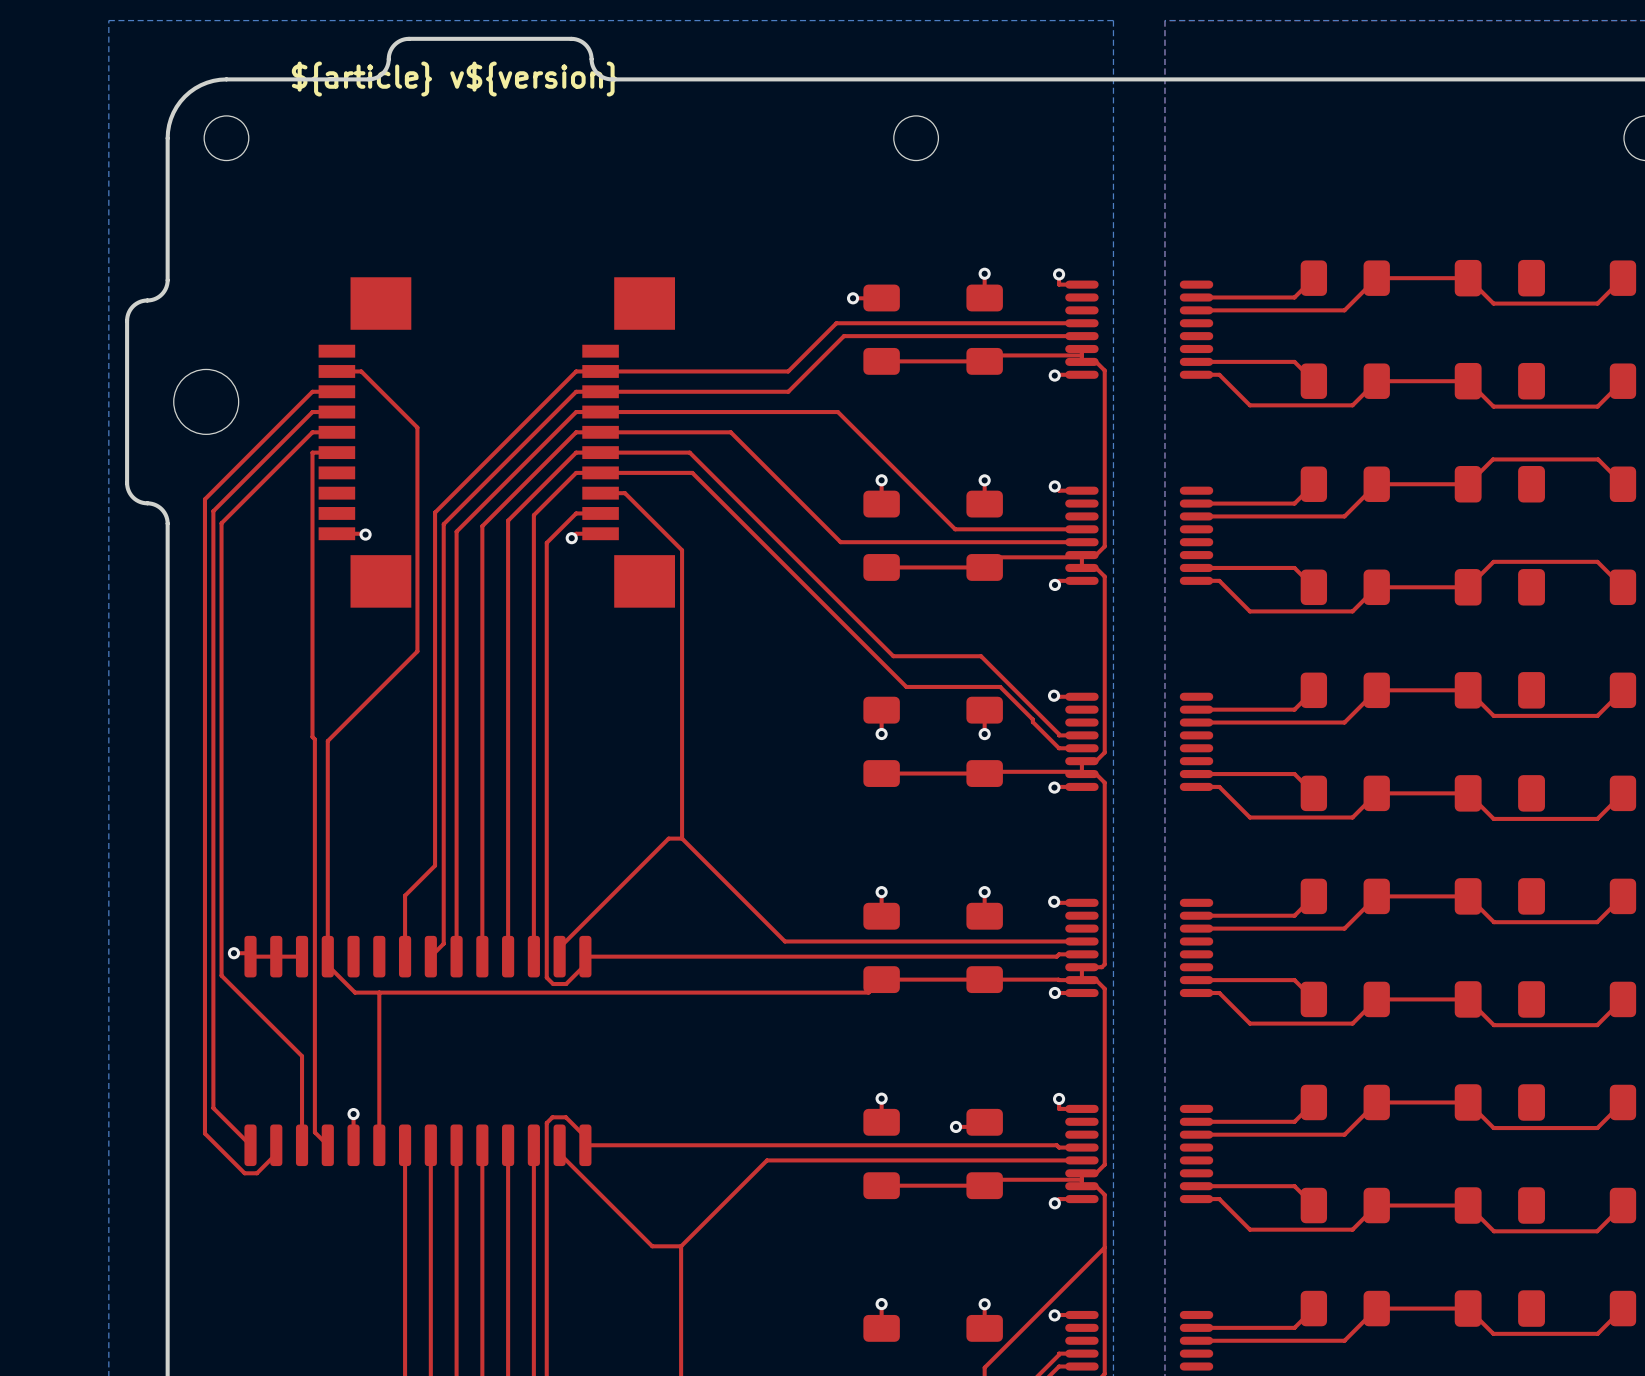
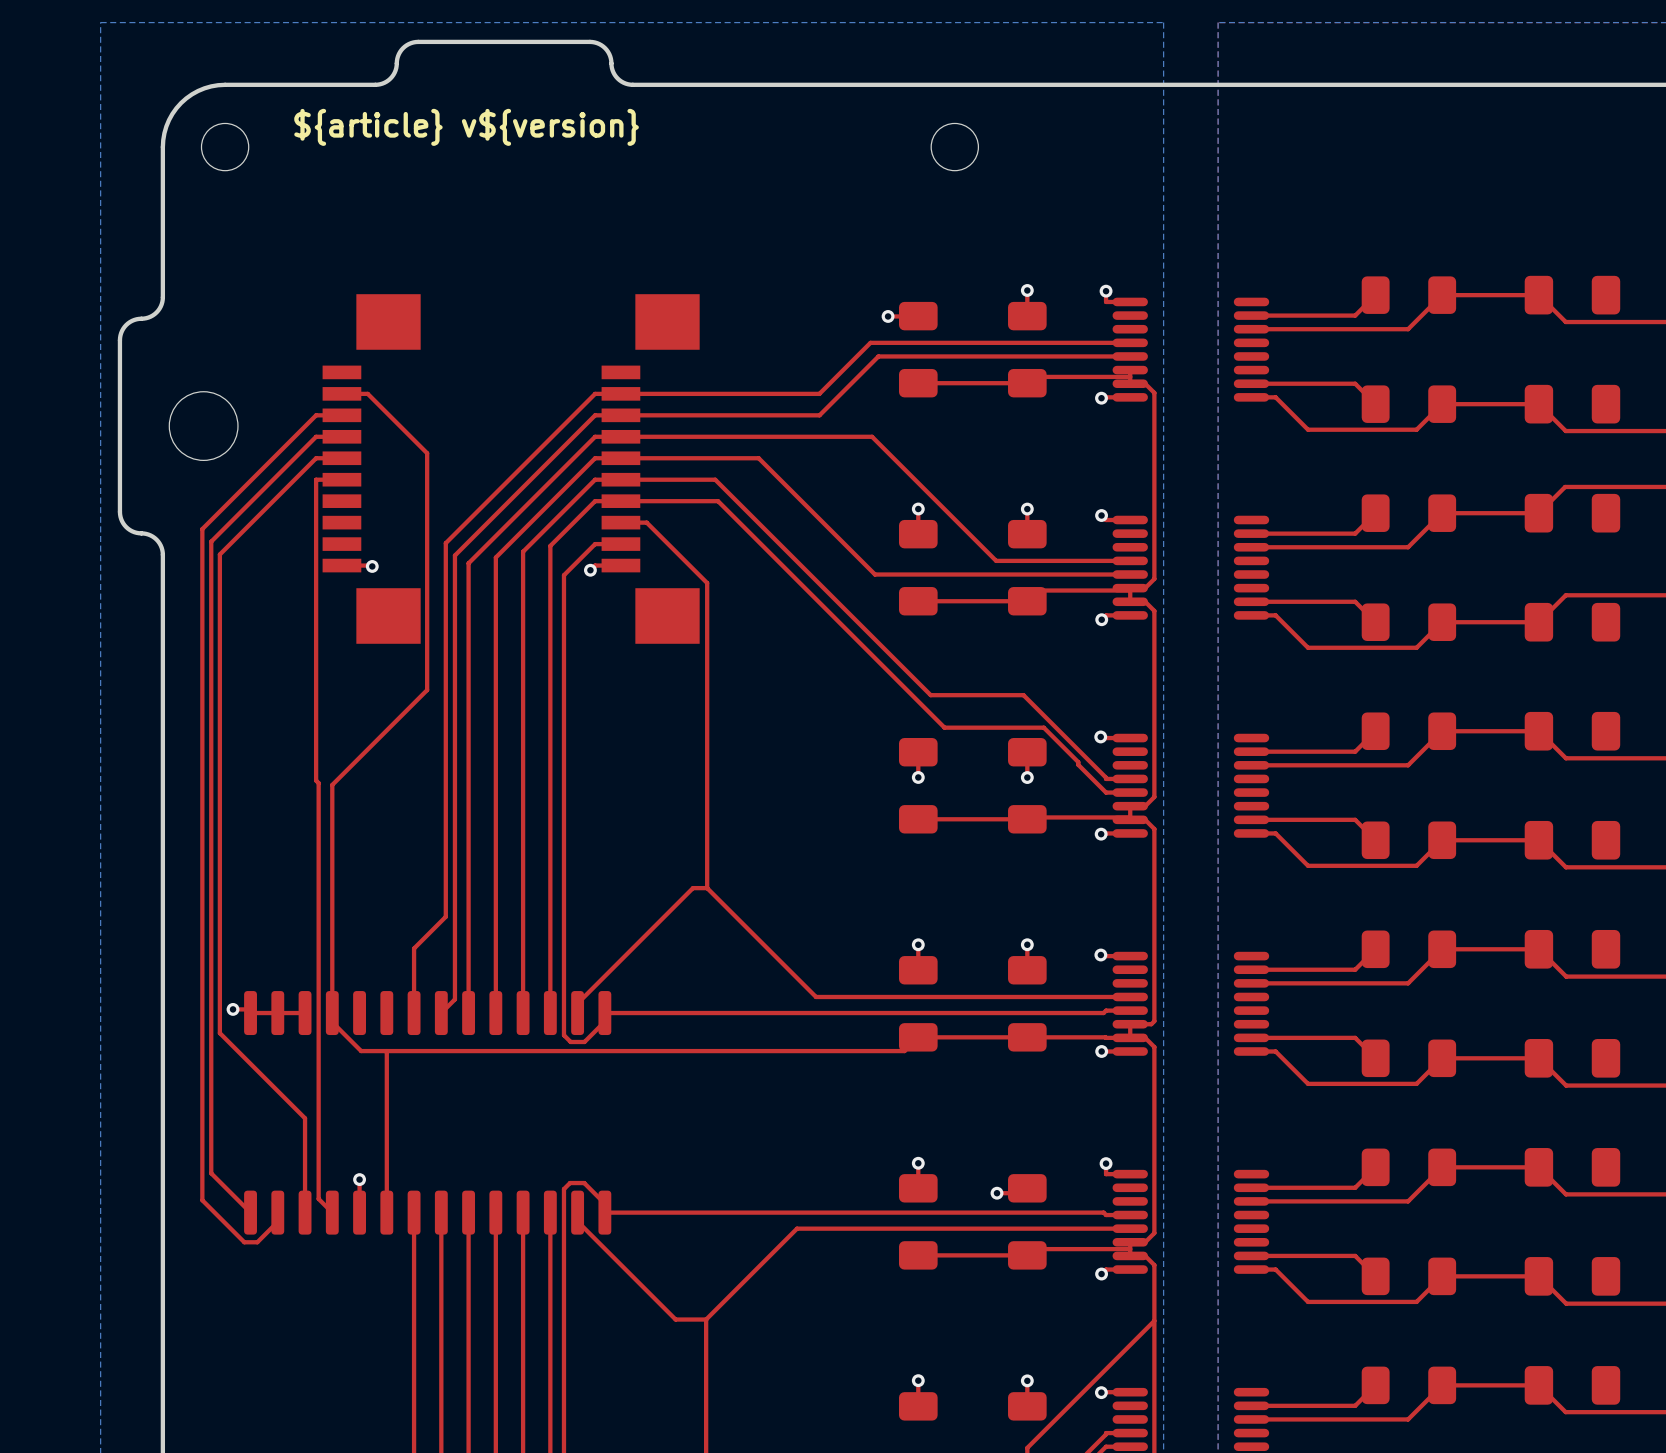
text position: ${article} v${version} (454, 79) -> ${article} v${version} (466, 127)

